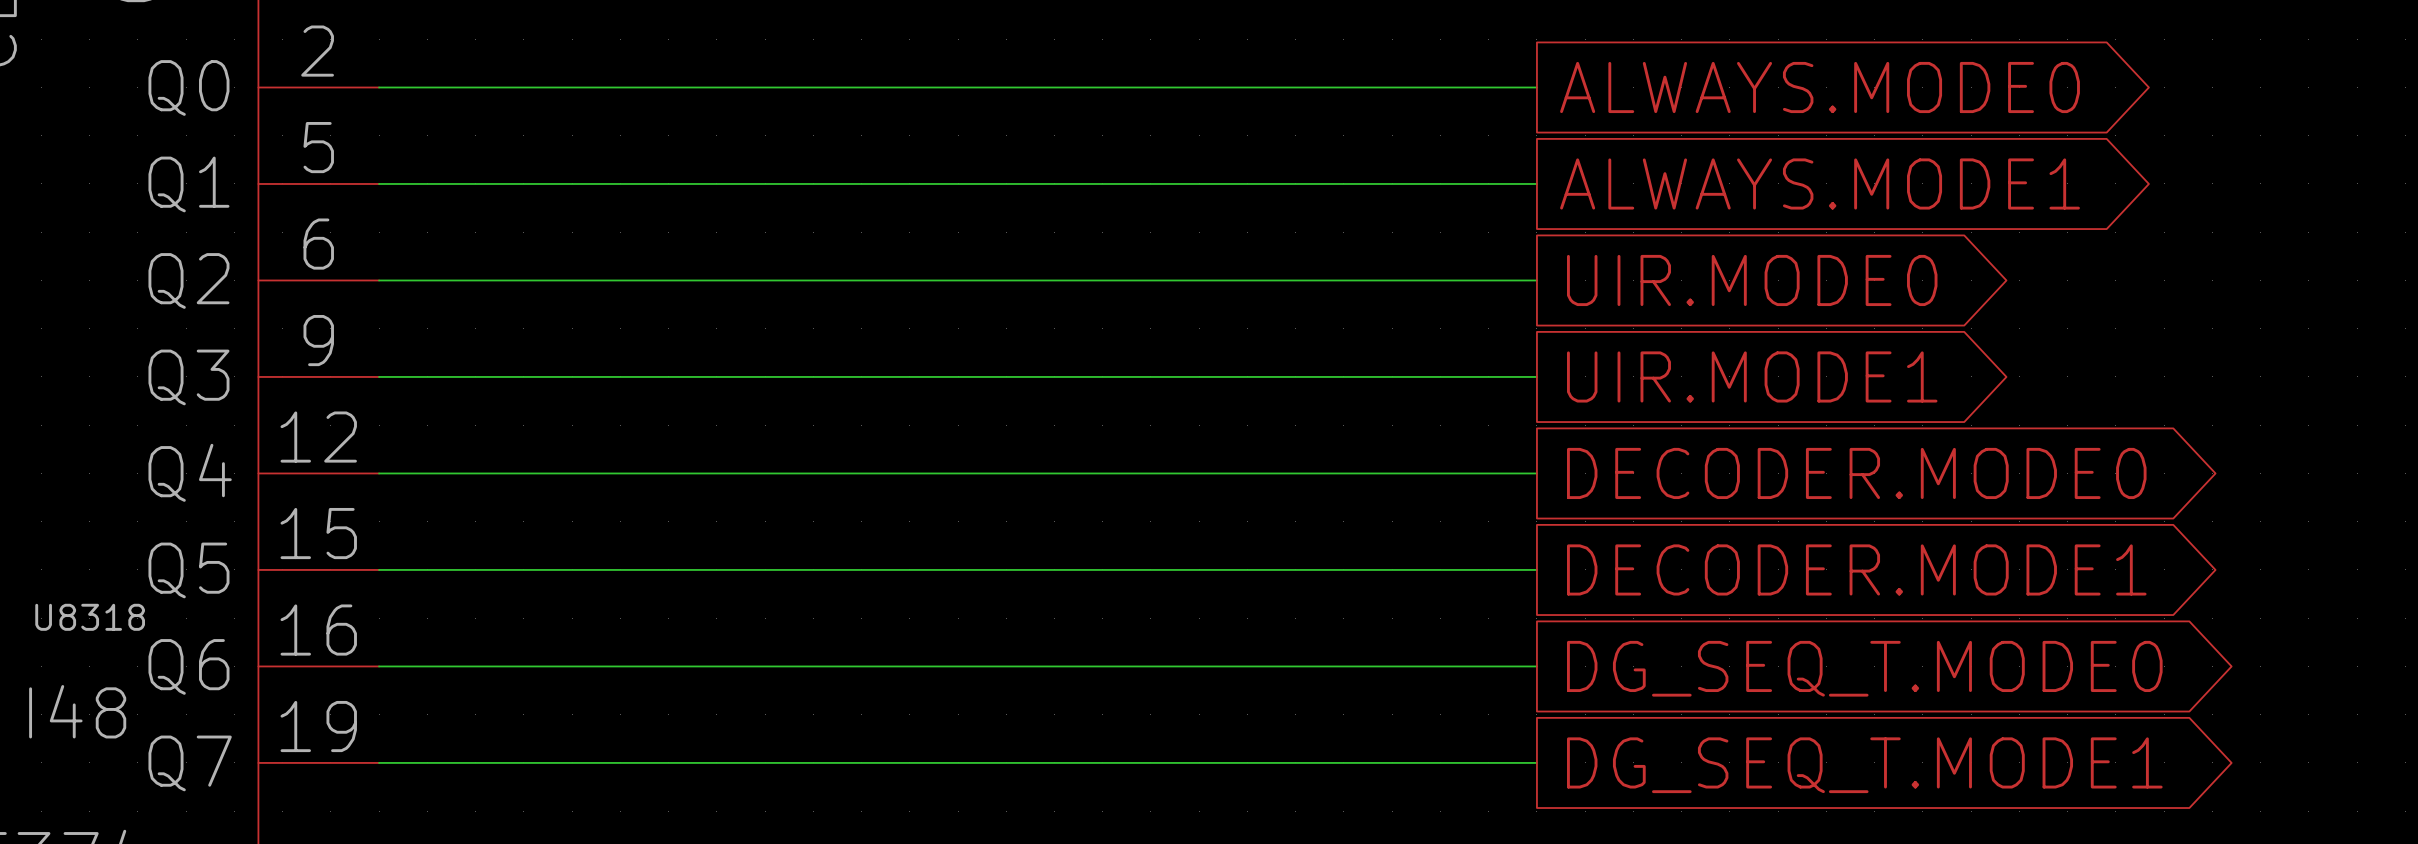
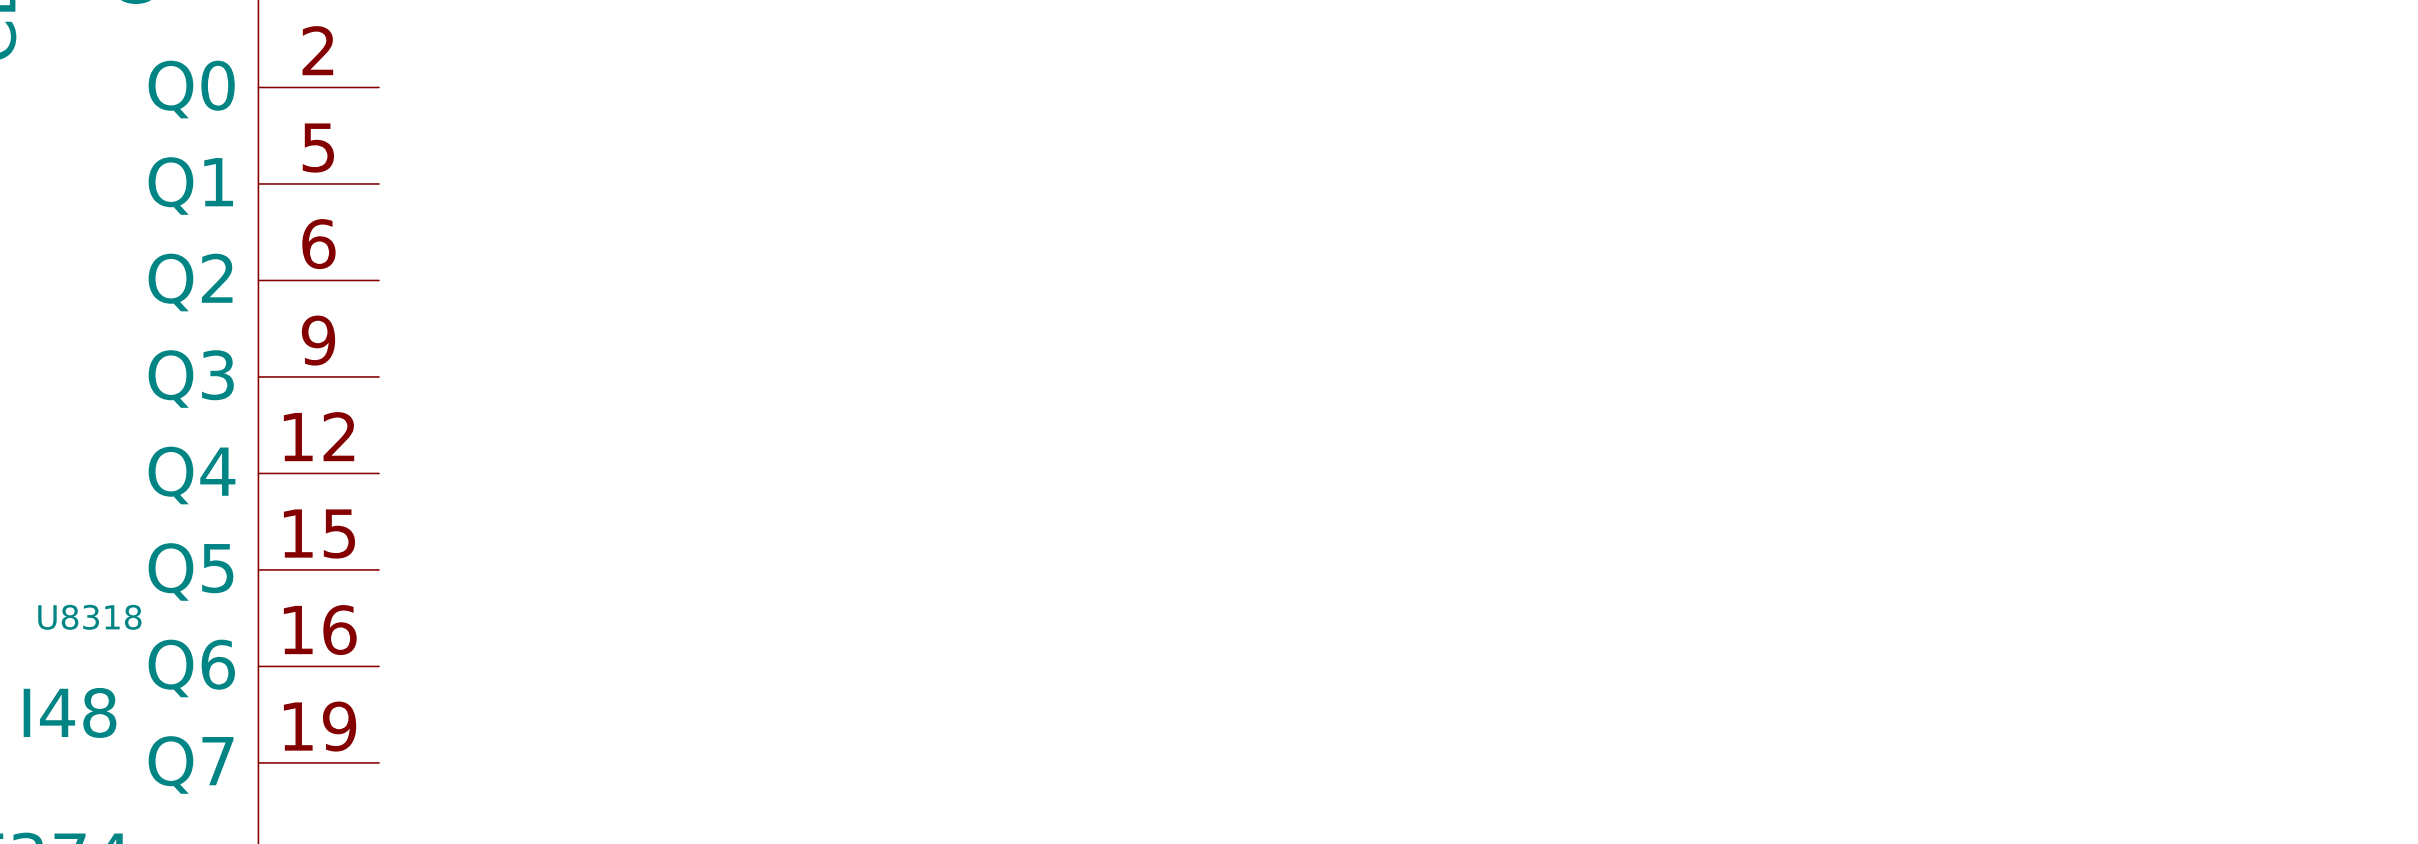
wire: (379, 87) (1536, 87) -> none
global label: ALWAYS.MODE0 (1820, 87) -> none
wire: (379, 183) (1536, 183) -> none
global label: ALWAYS.MODE1 (1820, 183) -> none
wire: (379, 280) (1536, 280) -> none
global label: UIR.MODE0 (1752, 280) -> none
wire: (379, 376) (1536, 376) -> none
global label: UIR.MODE1 (1752, 376) -> none
wire: (379, 473) (1536, 473) -> none
global label: DECODER.MODE0 (1856, 473) -> none
wire: (379, 569) (1536, 569) -> none
global label: DECODER.MODE1 (1856, 569) -> none
wire: (379, 666) (1536, 666) -> none
global label: DG_SEQ_T.MODE0 (1864, 668) -> none
wire: (379, 762) (1536, 762) -> none
global label: DG_SEQ_T.MODE1 (1864, 765) -> none

